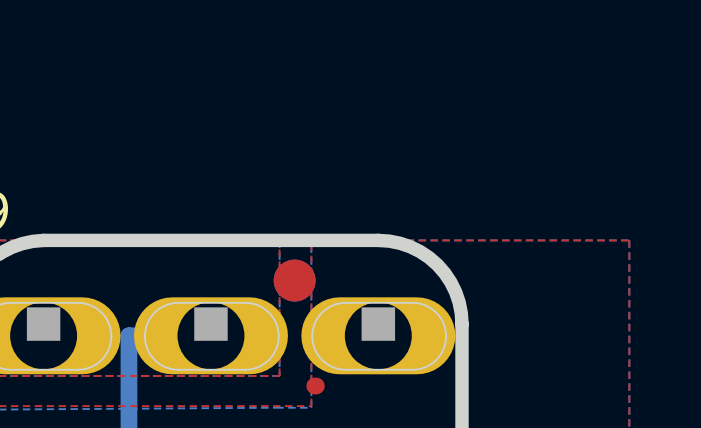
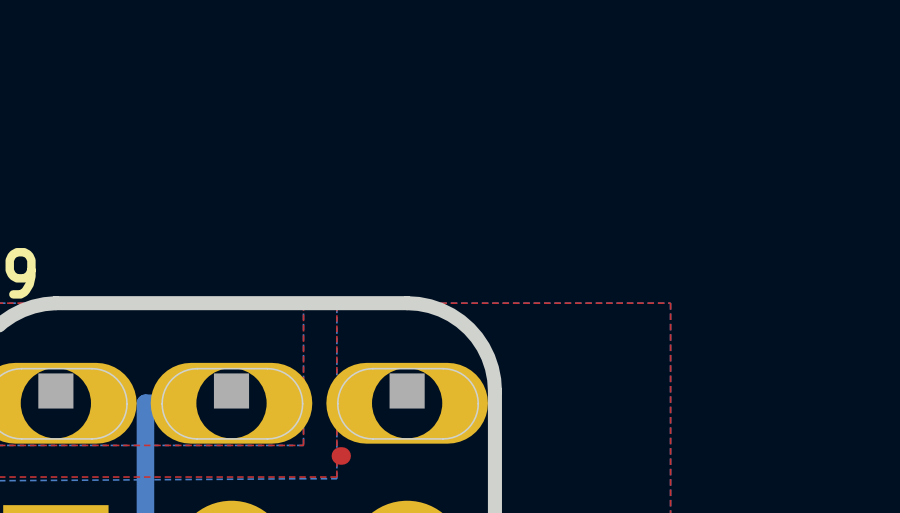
part: (294, 280) -> none

